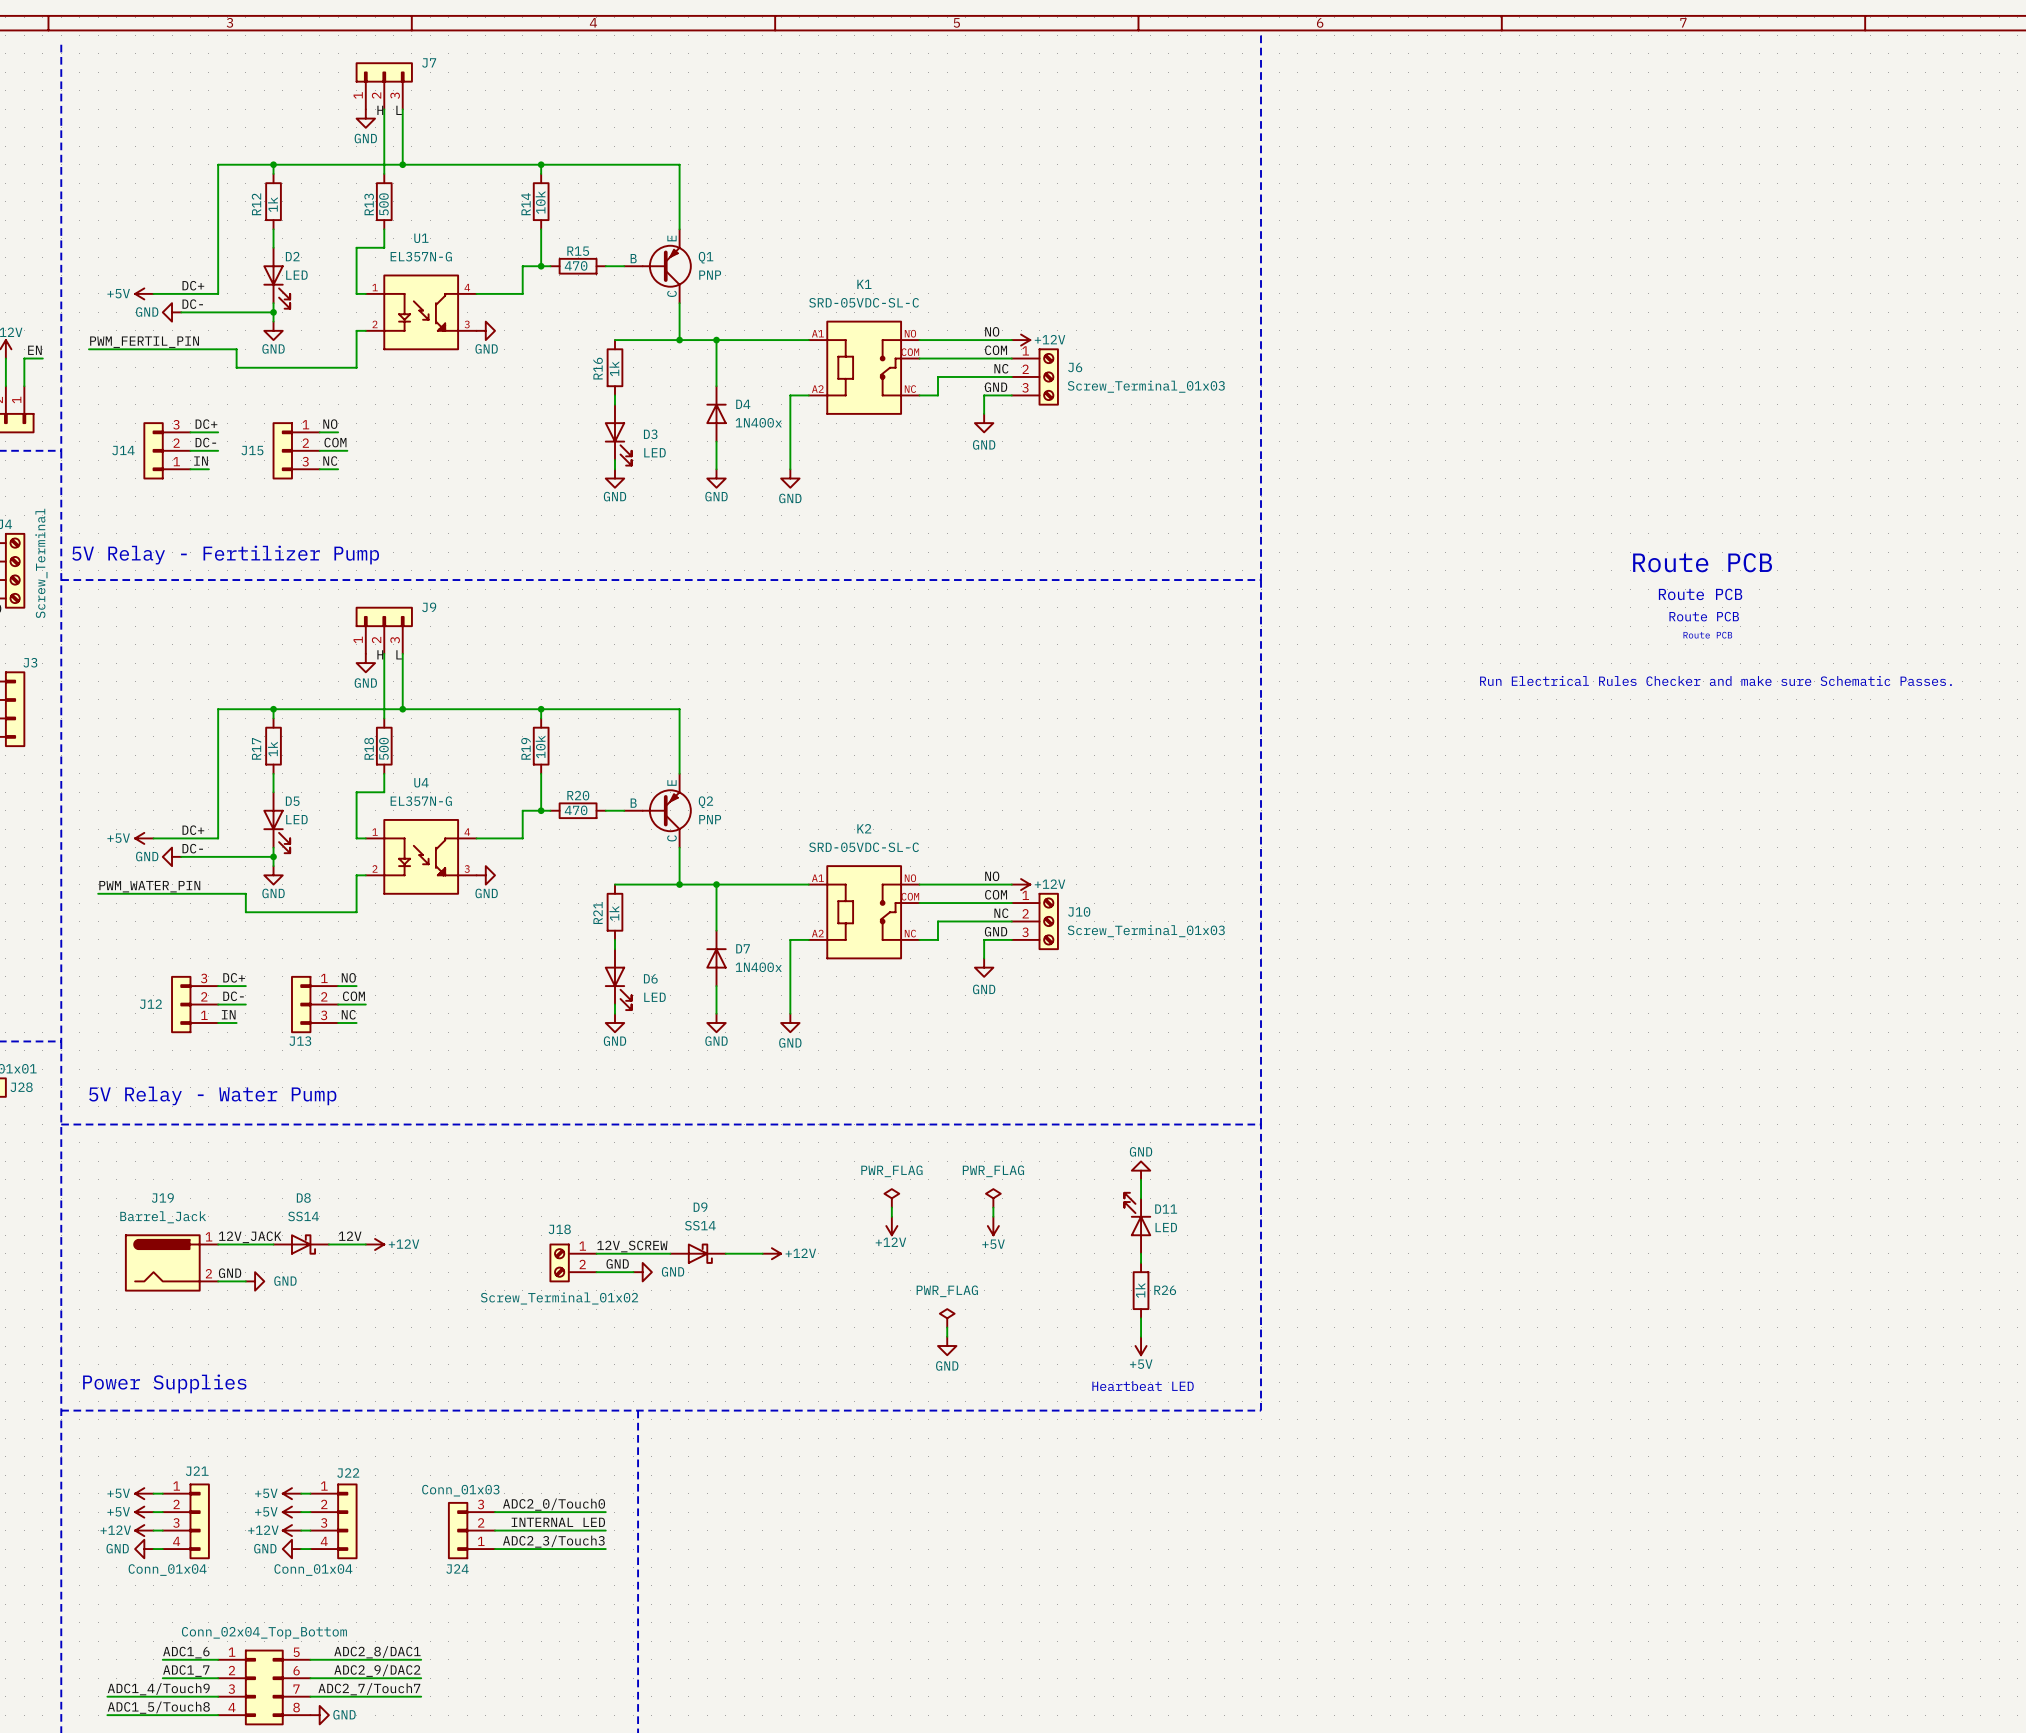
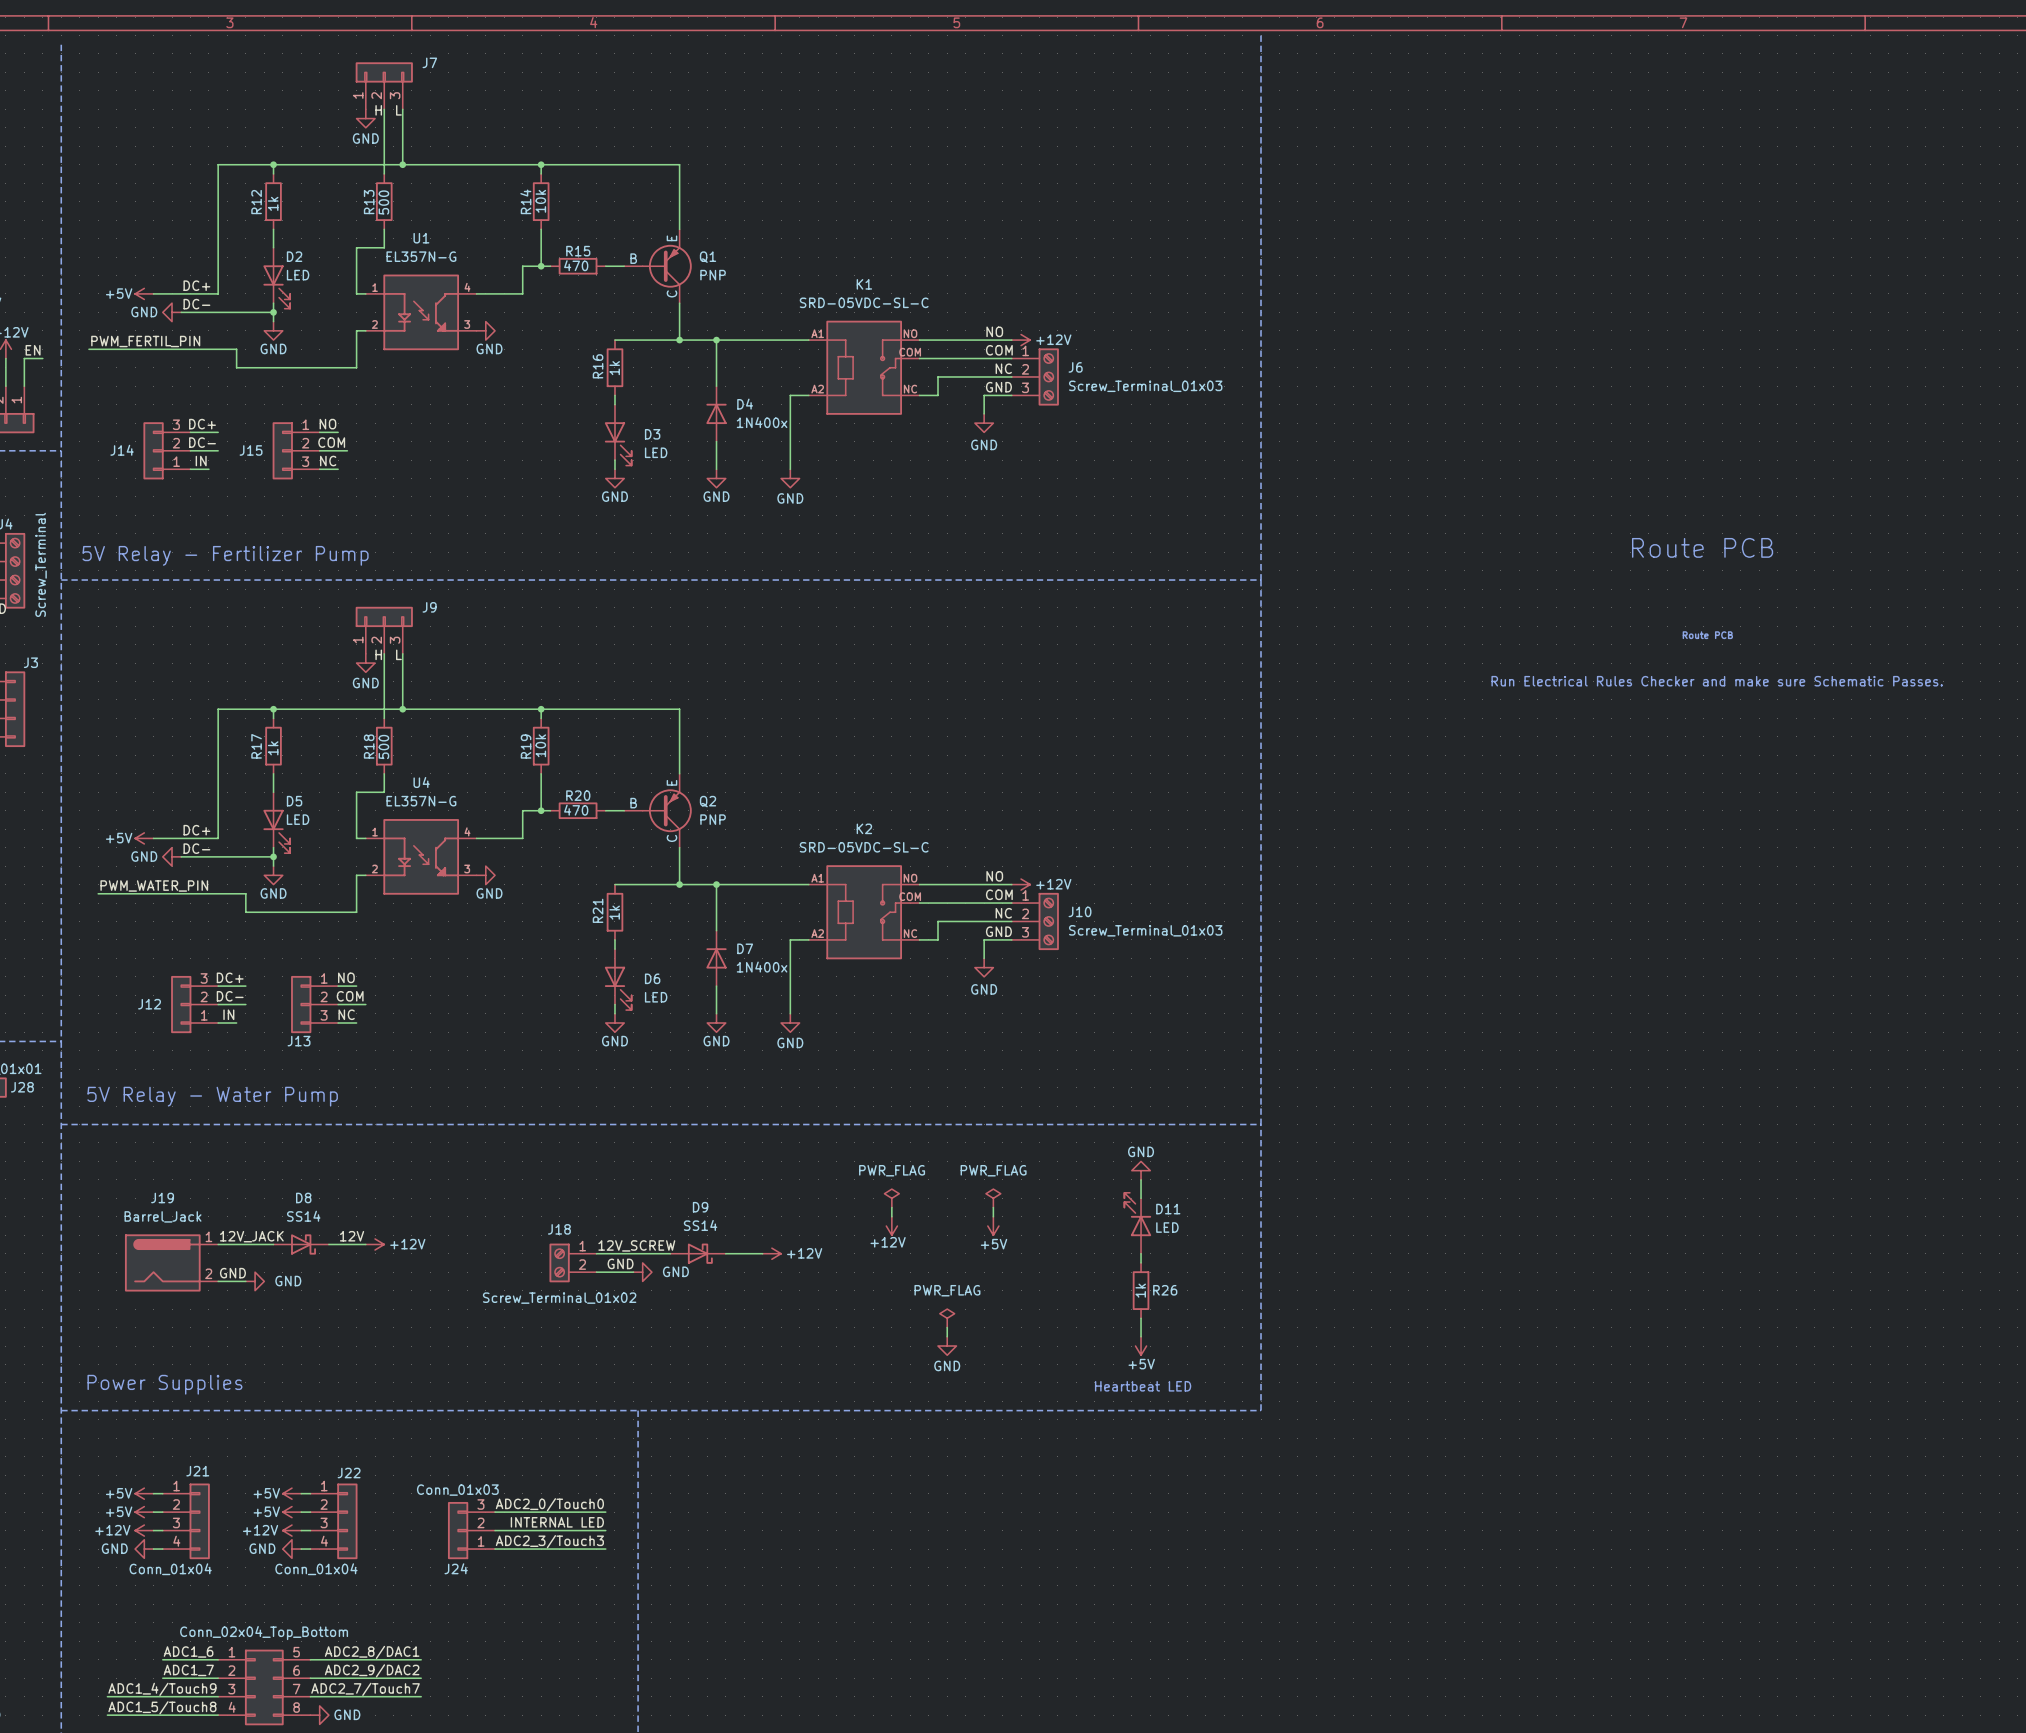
text position: Route PCB (1702, 562) -> Route PCB (1702, 547)
text: Route PCB (1700, 594) -> none
text: Route PCB (1704, 616) -> none

